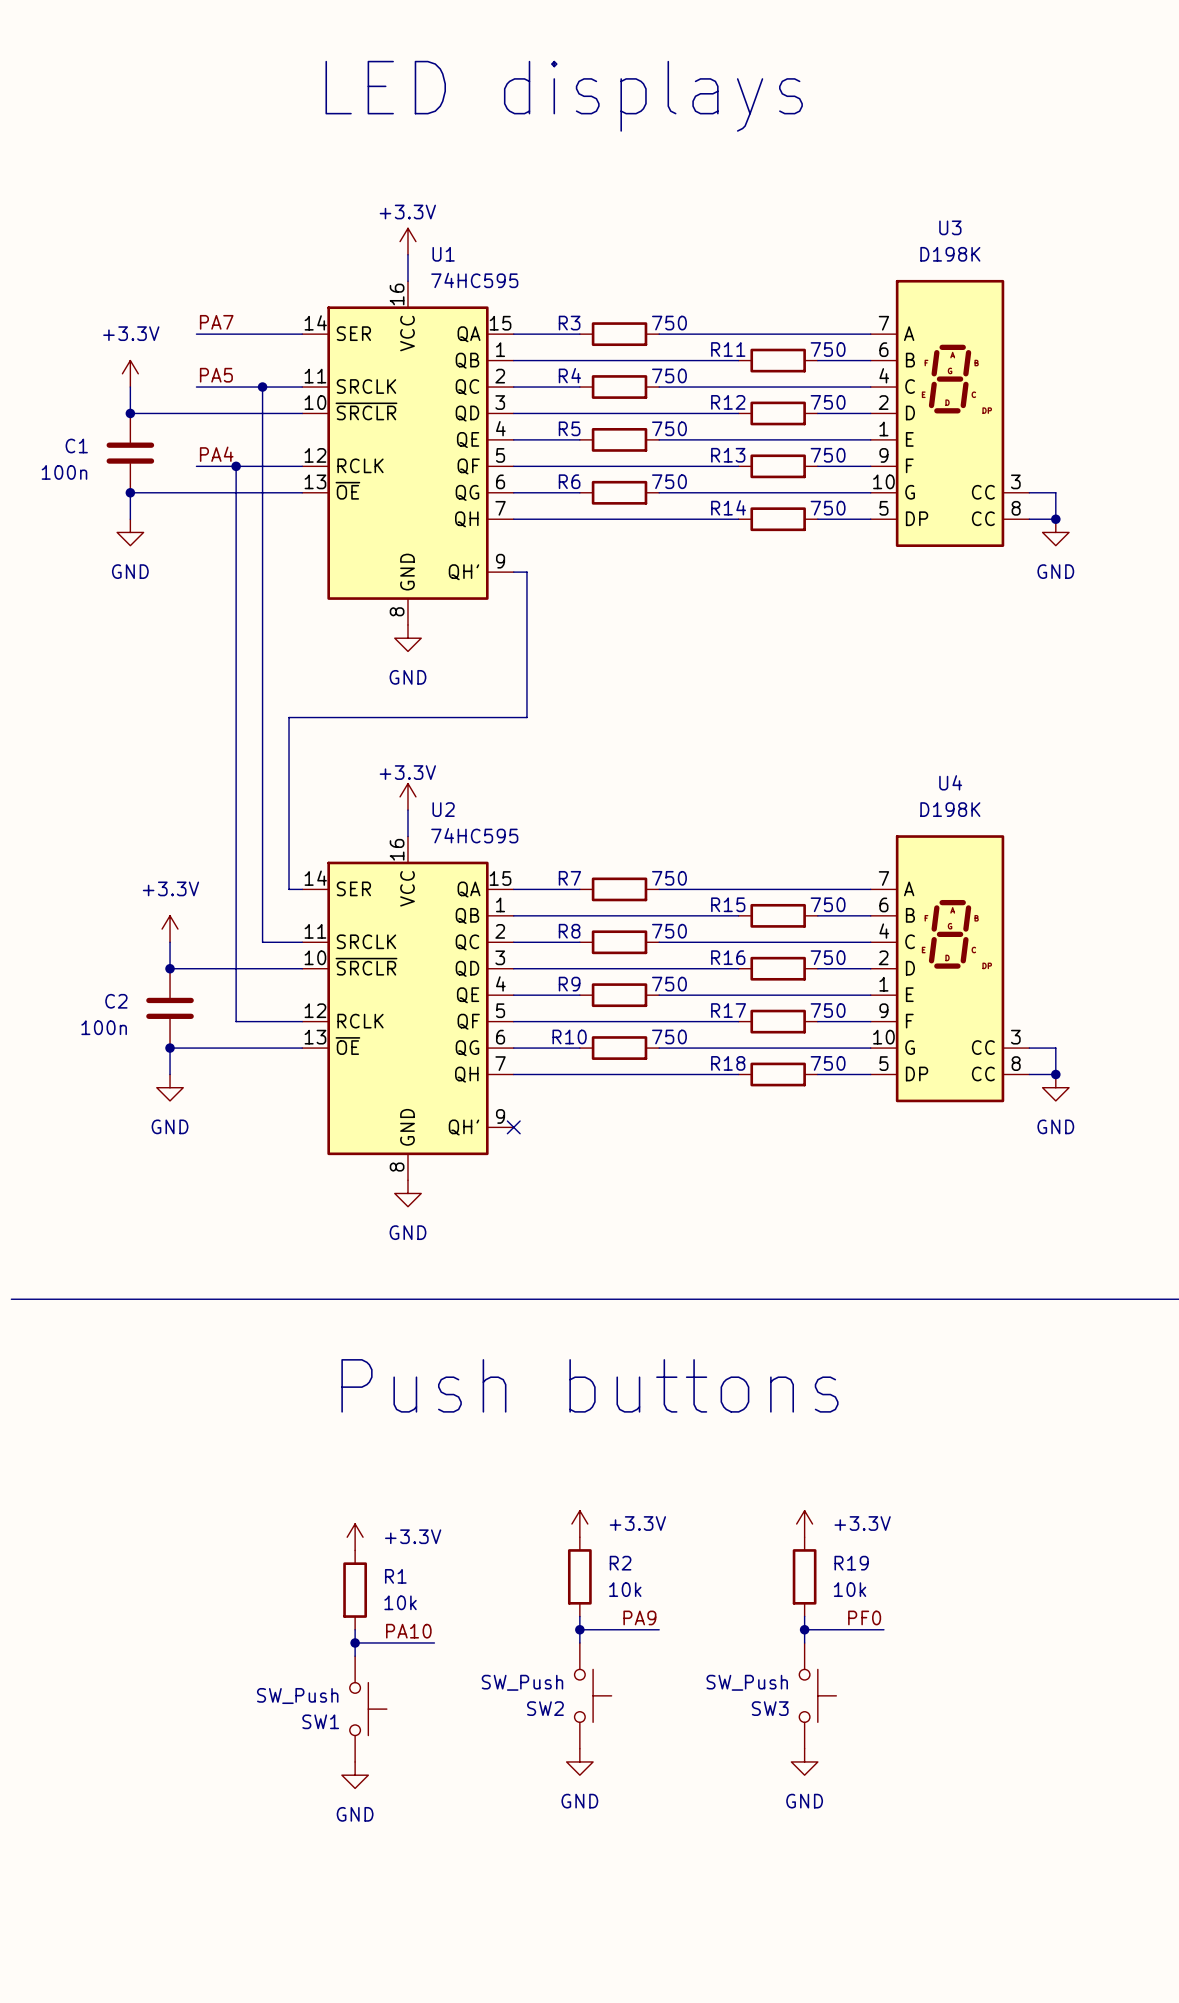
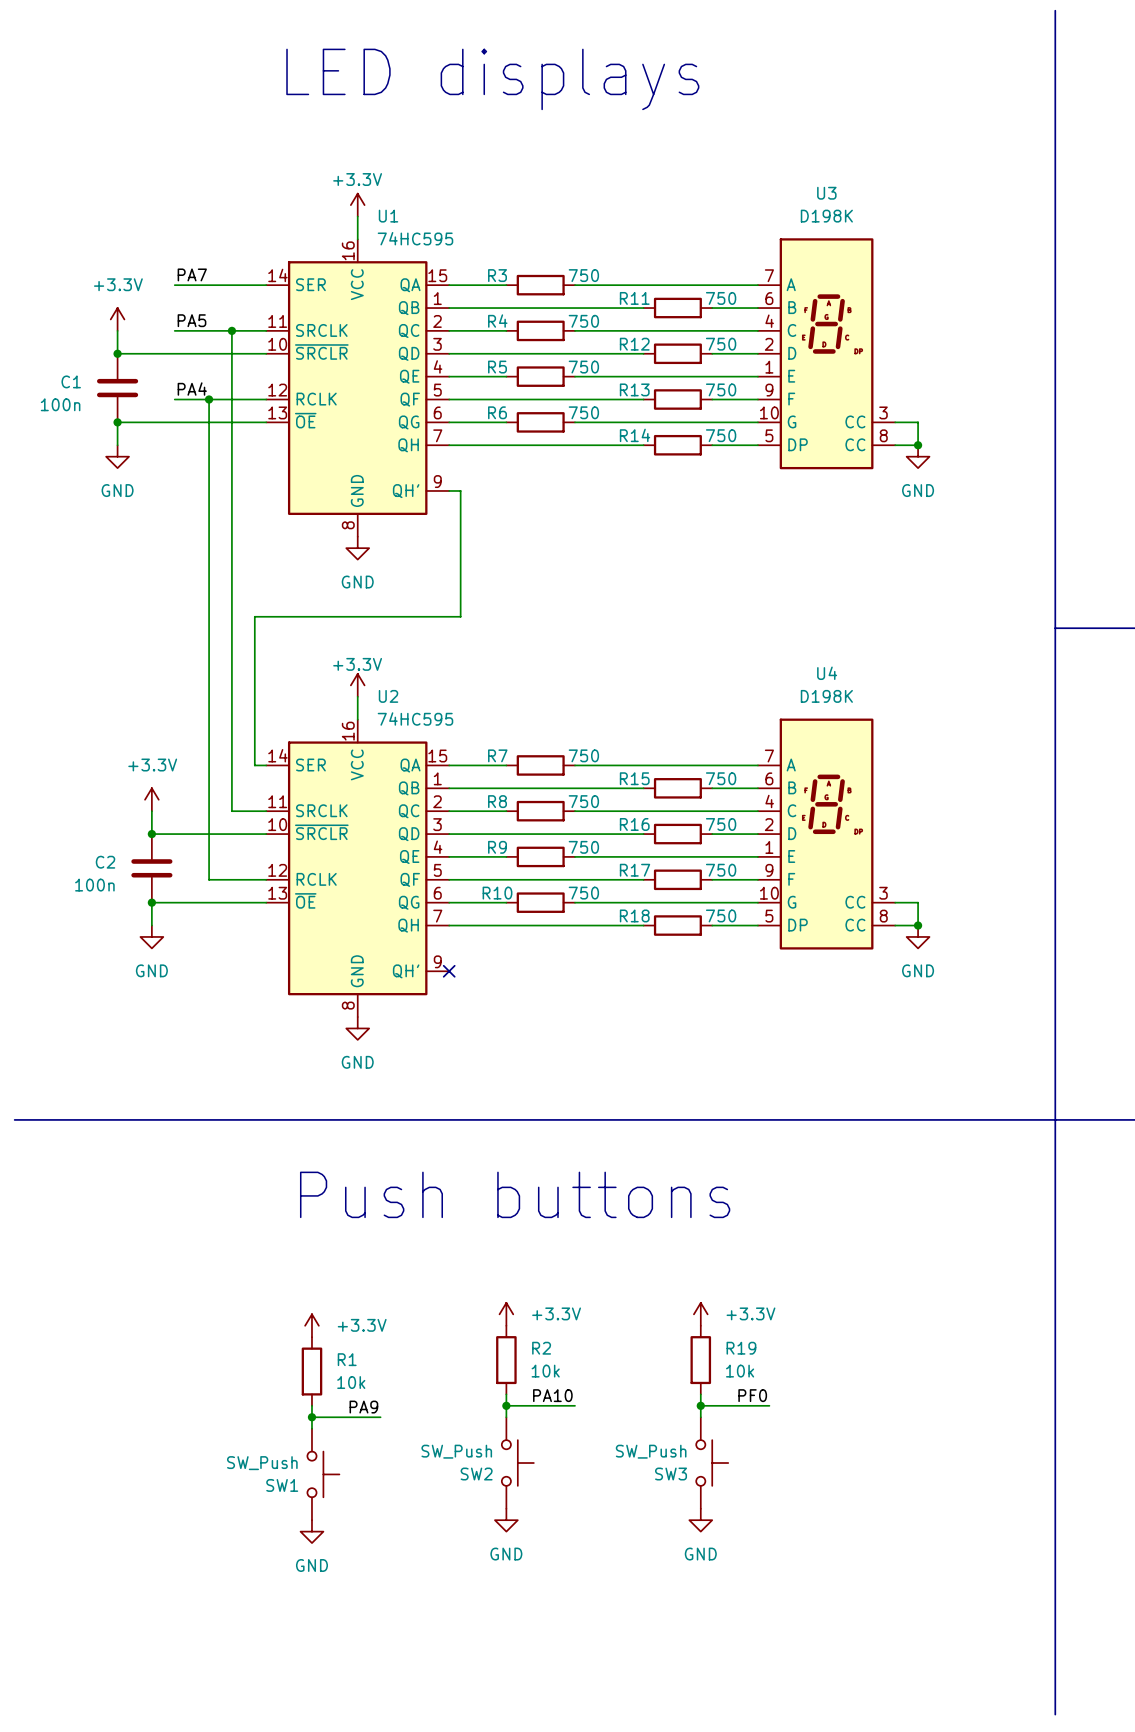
label: PA9 (639, 1617) -> PA10 (552, 1395)
label: PA10 (408, 1631) -> PA9 (363, 1407)

